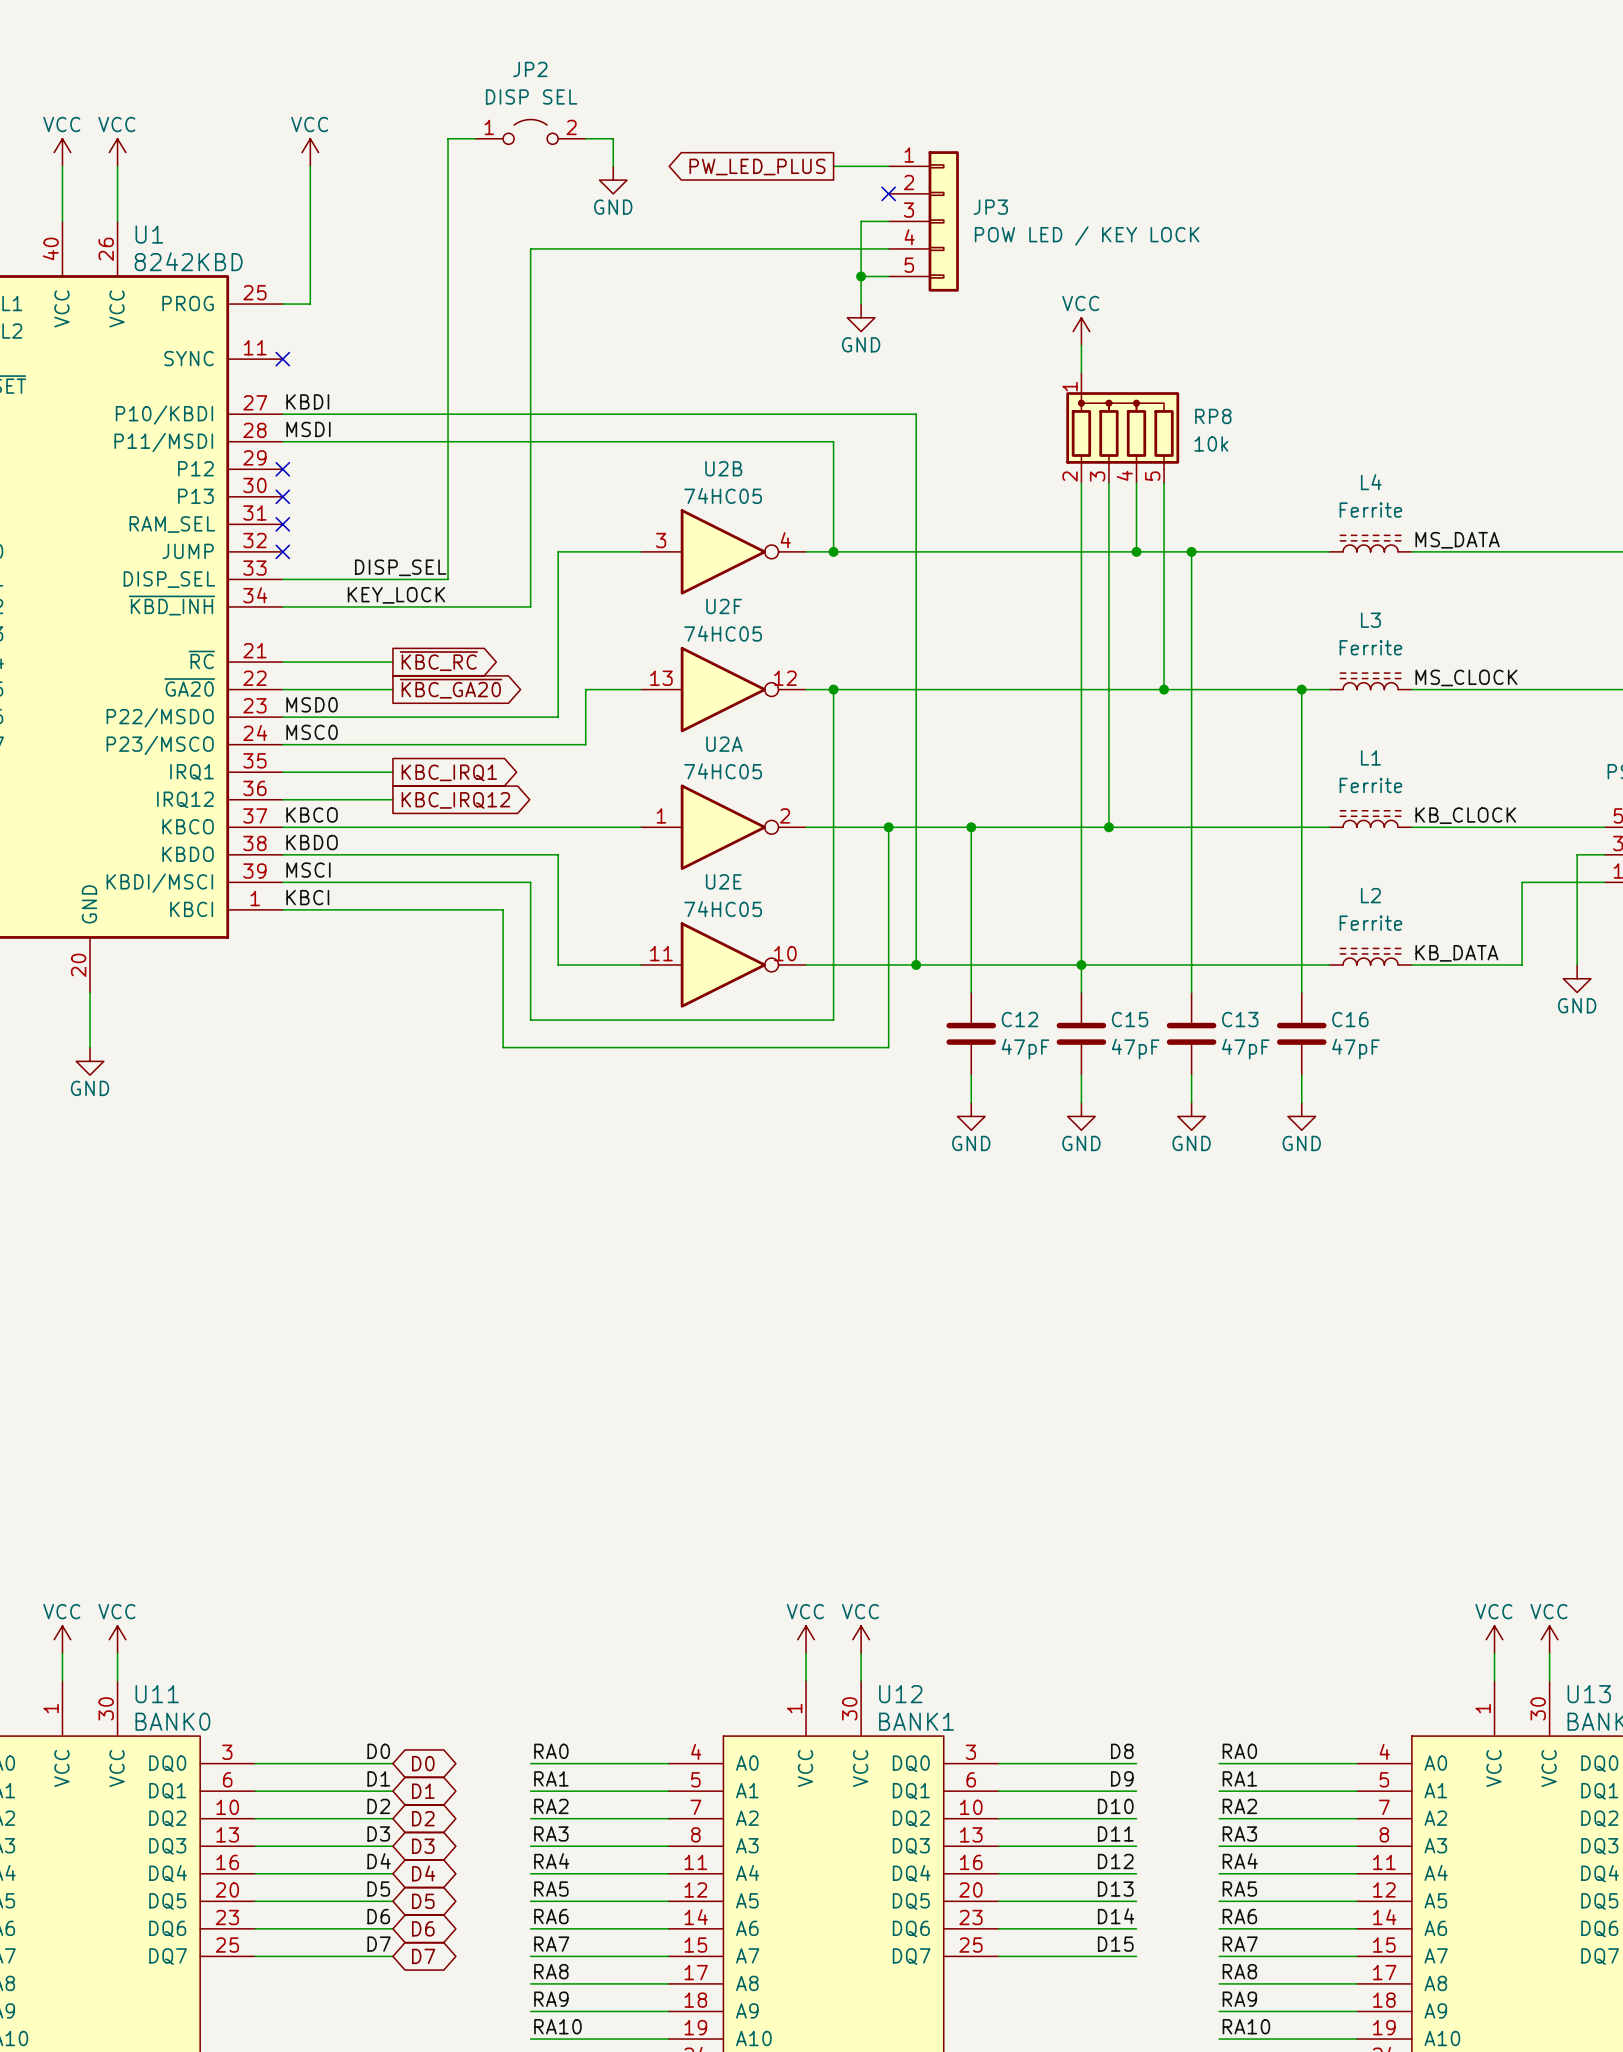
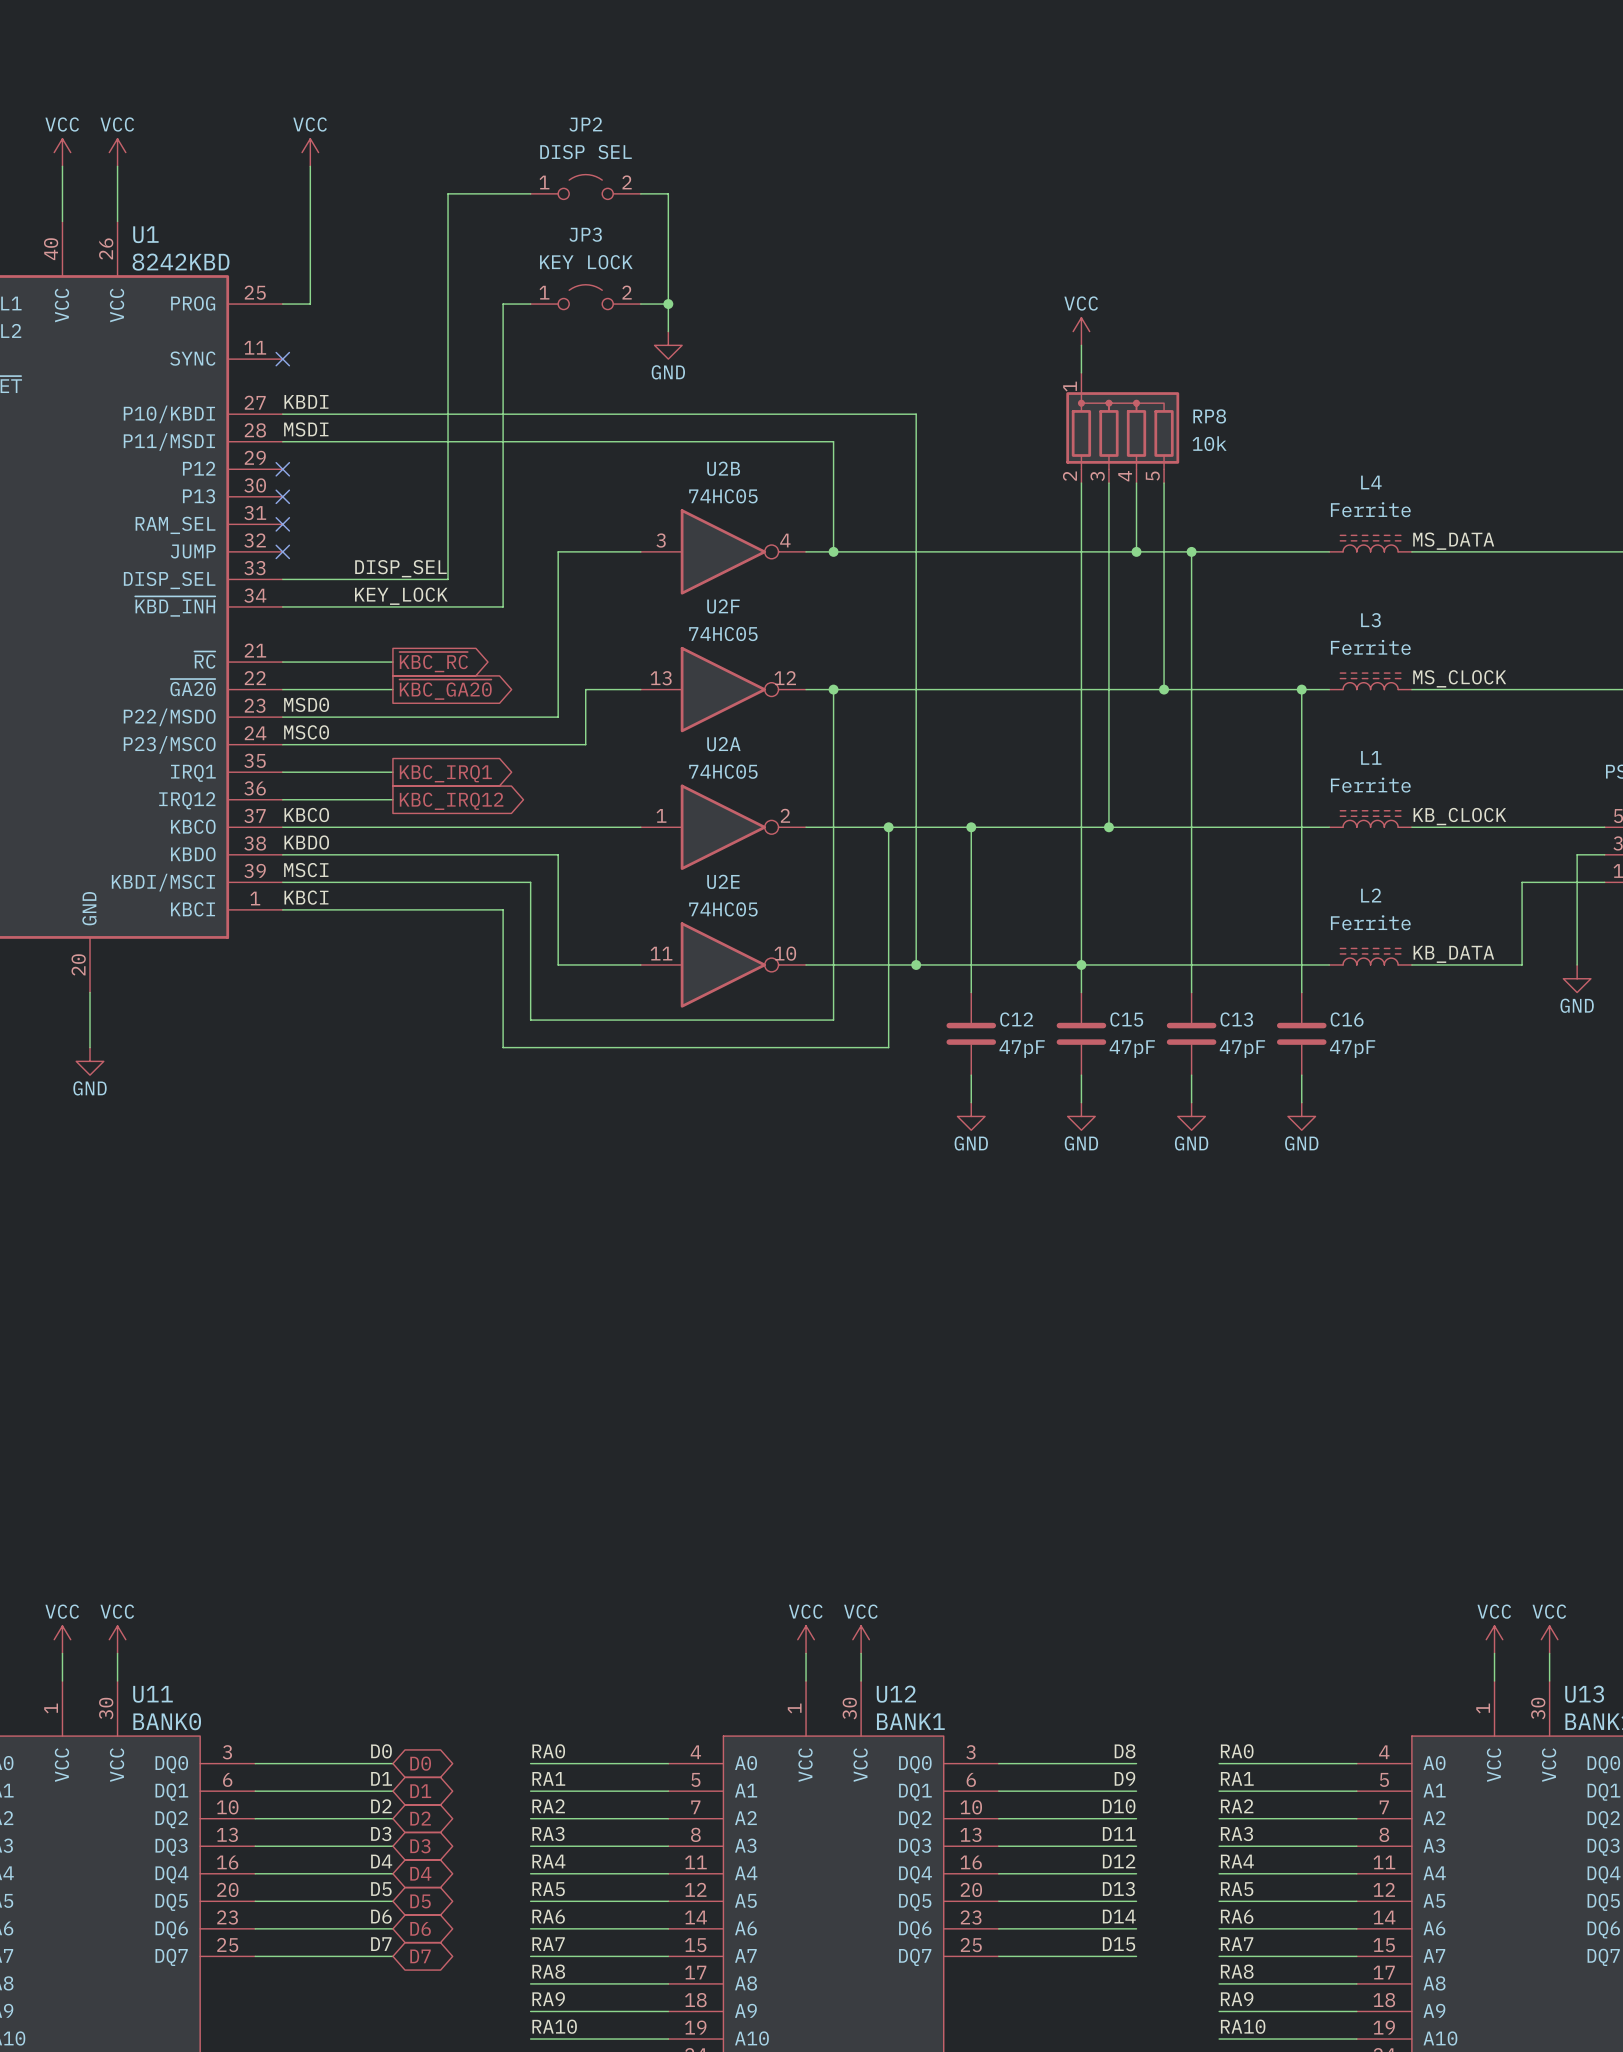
JP2 position: (530, 131) -> (585, 186)
wire: (475, 138) (448, 138) (448, 193) -> (530, 193) (448, 193)
wire: (585, 138) (613, 138) (613, 166) -> none
JP3 symbol: [888, 151, 959, 292] -> [530, 284, 641, 310]
global label: PW_LED_PLUS (757, 166) -> none
wire: (833, 166) (888, 166) -> none
power symbol: GND (613, 180) -> none
wire: none -> (640, 193) (668, 193) (668, 331)
no-connect mark: (888, 193) -> none
JP3 name position: JP3 (990, 207) -> JP3 (585, 234)
wire: (888, 221) (861, 221) (861, 304) -> none
JP3 value: POW LED / KEY LOCK (1087, 235) -> KEY LOCK (586, 262)
wire: (888, 248) (530, 248) (530, 606) (503, 606) -> (530, 304) (503, 304) (503, 606)
wire: (861, 276) (888, 276) -> (640, 304) (668, 304)
junction: (861, 276) -> none
junction: none -> (668, 304)
power symbol: GND (861, 317) -> none
power symbol: none -> GND (668, 345)

